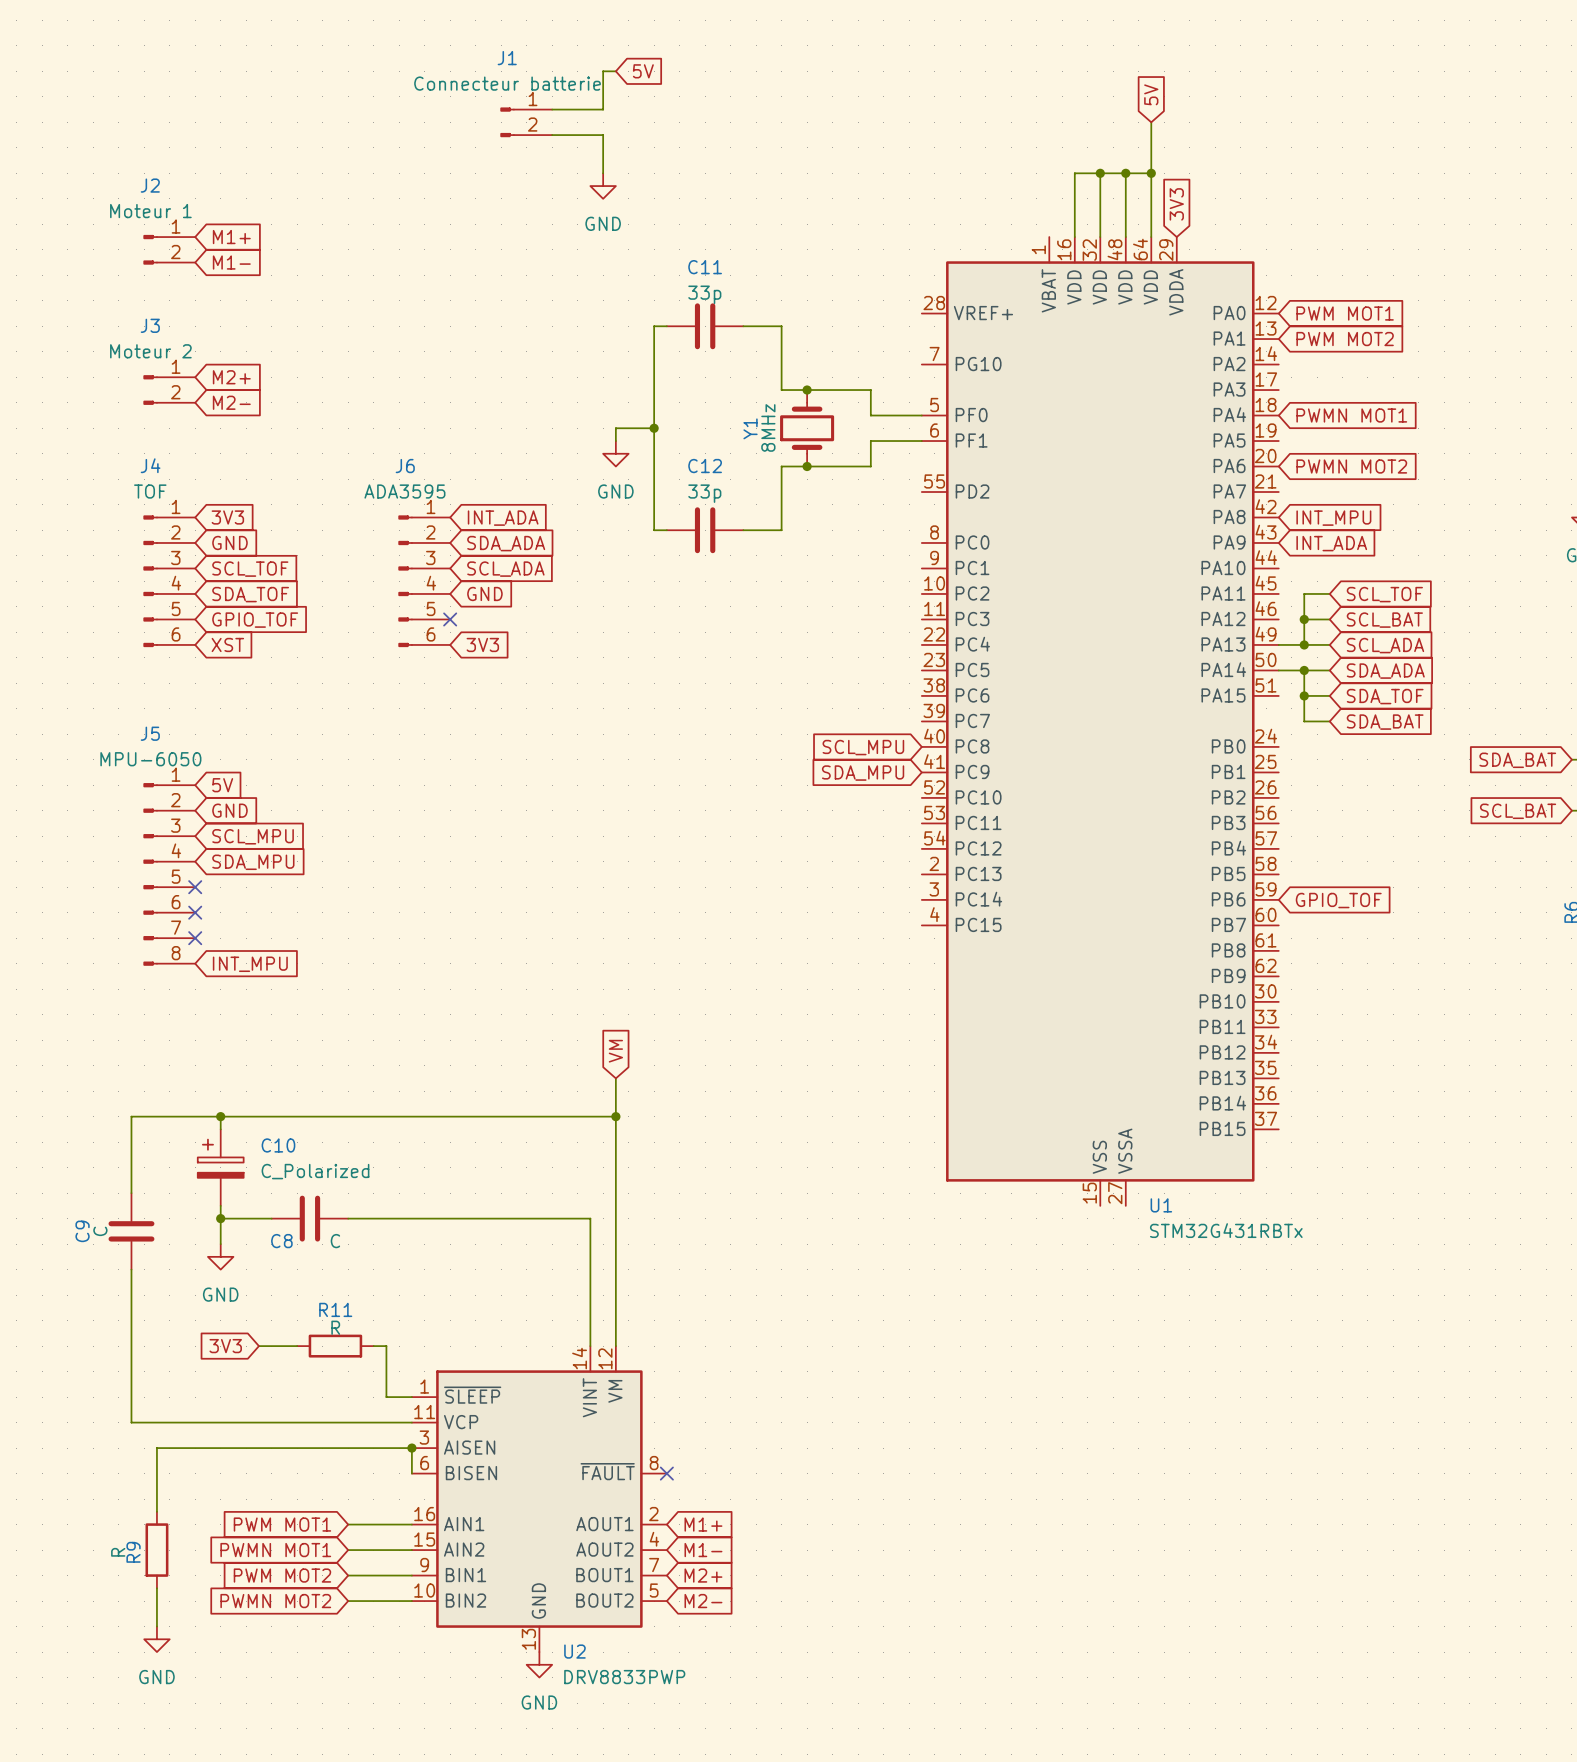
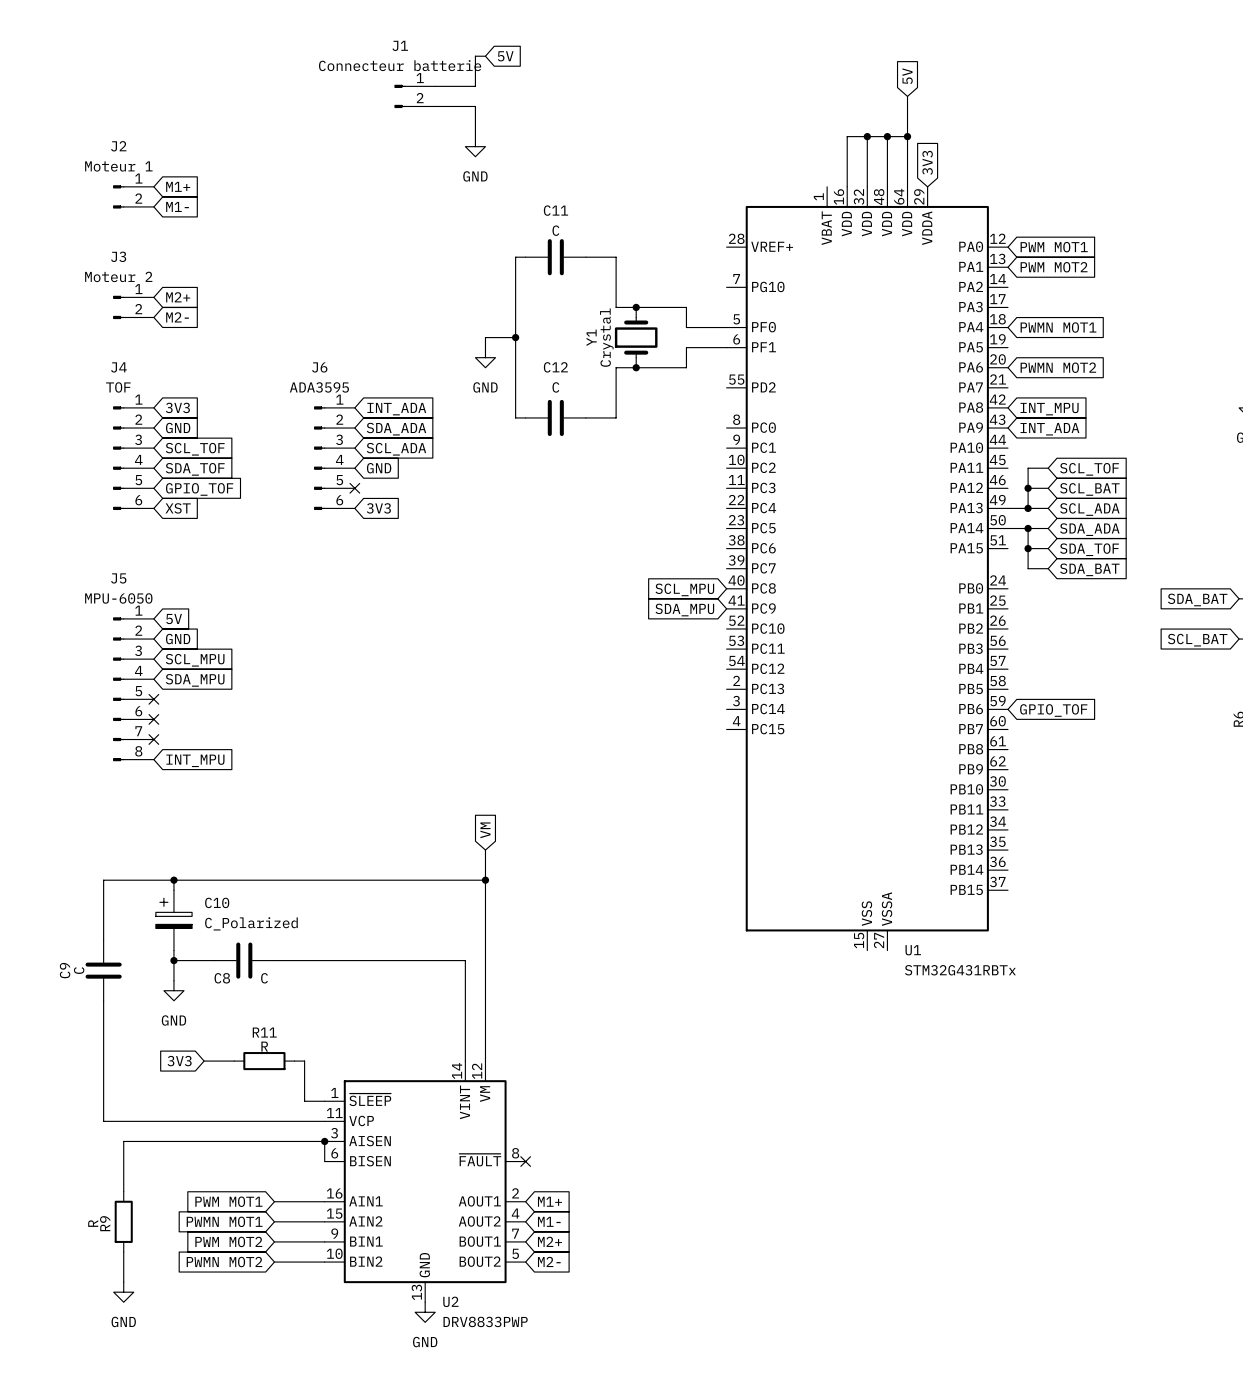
C11 value: 33p (704, 294) -> C (555, 230)
Y1 value: 8MHz (768, 427) -> Crystal (606, 337)
C12 value: 33p (704, 493) -> C (555, 387)

